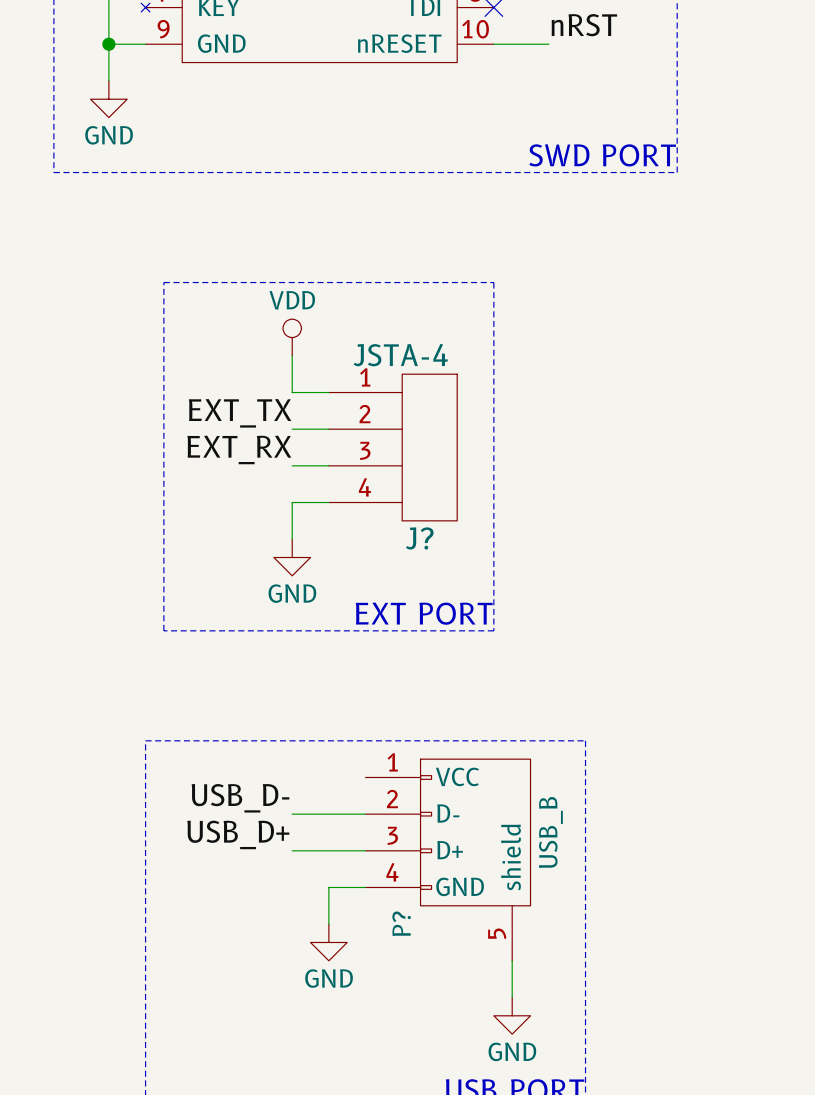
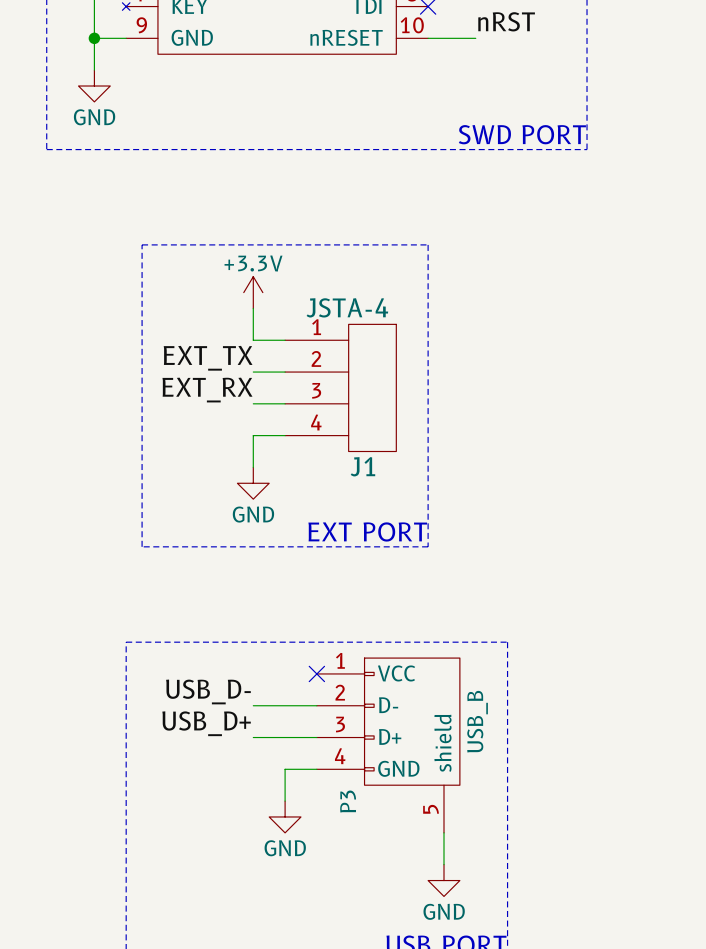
power symbol: VDD (292, 337) -> +3.3V (253, 292)
J? name: J? (419, 538) -> J1 (362, 466)
no-connect mark: none -> (316, 673)
P? name: P? (401, 923) -> P3 (348, 801)

